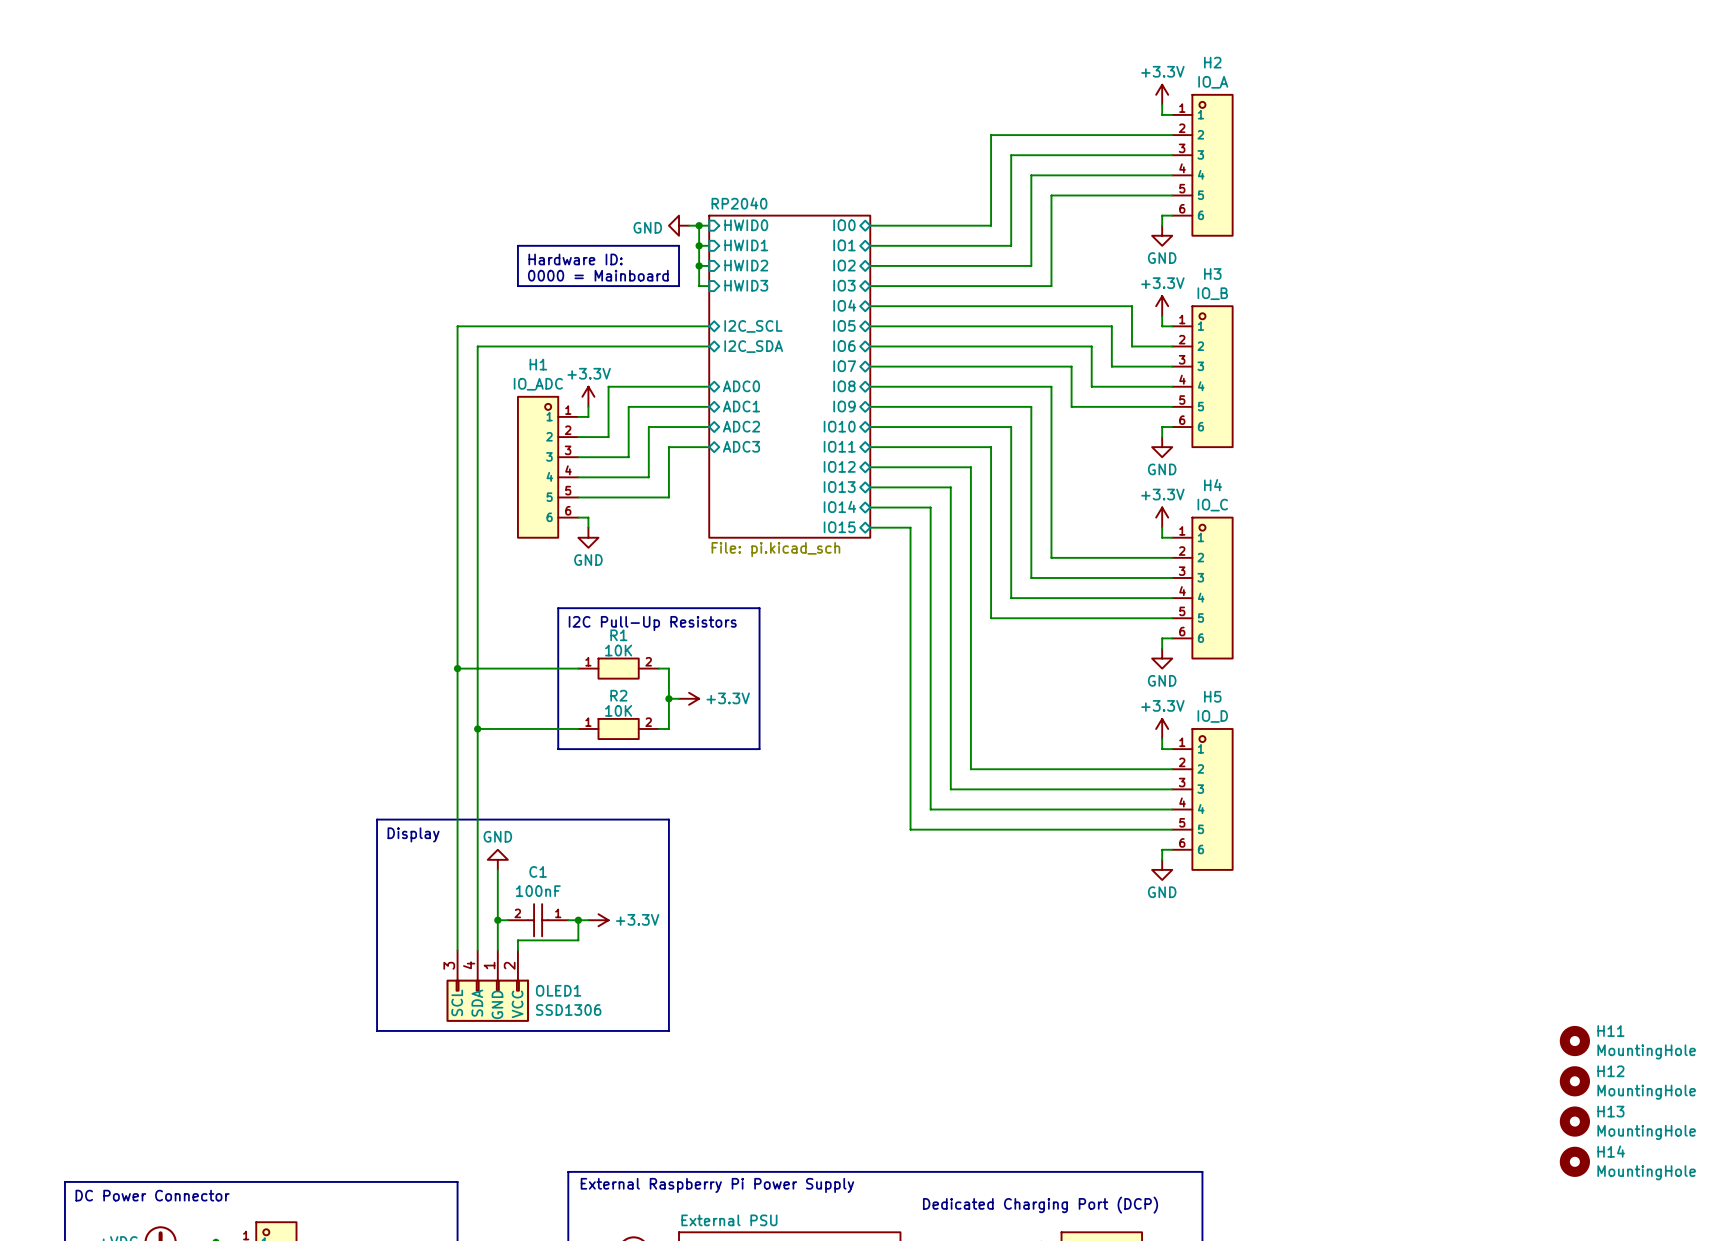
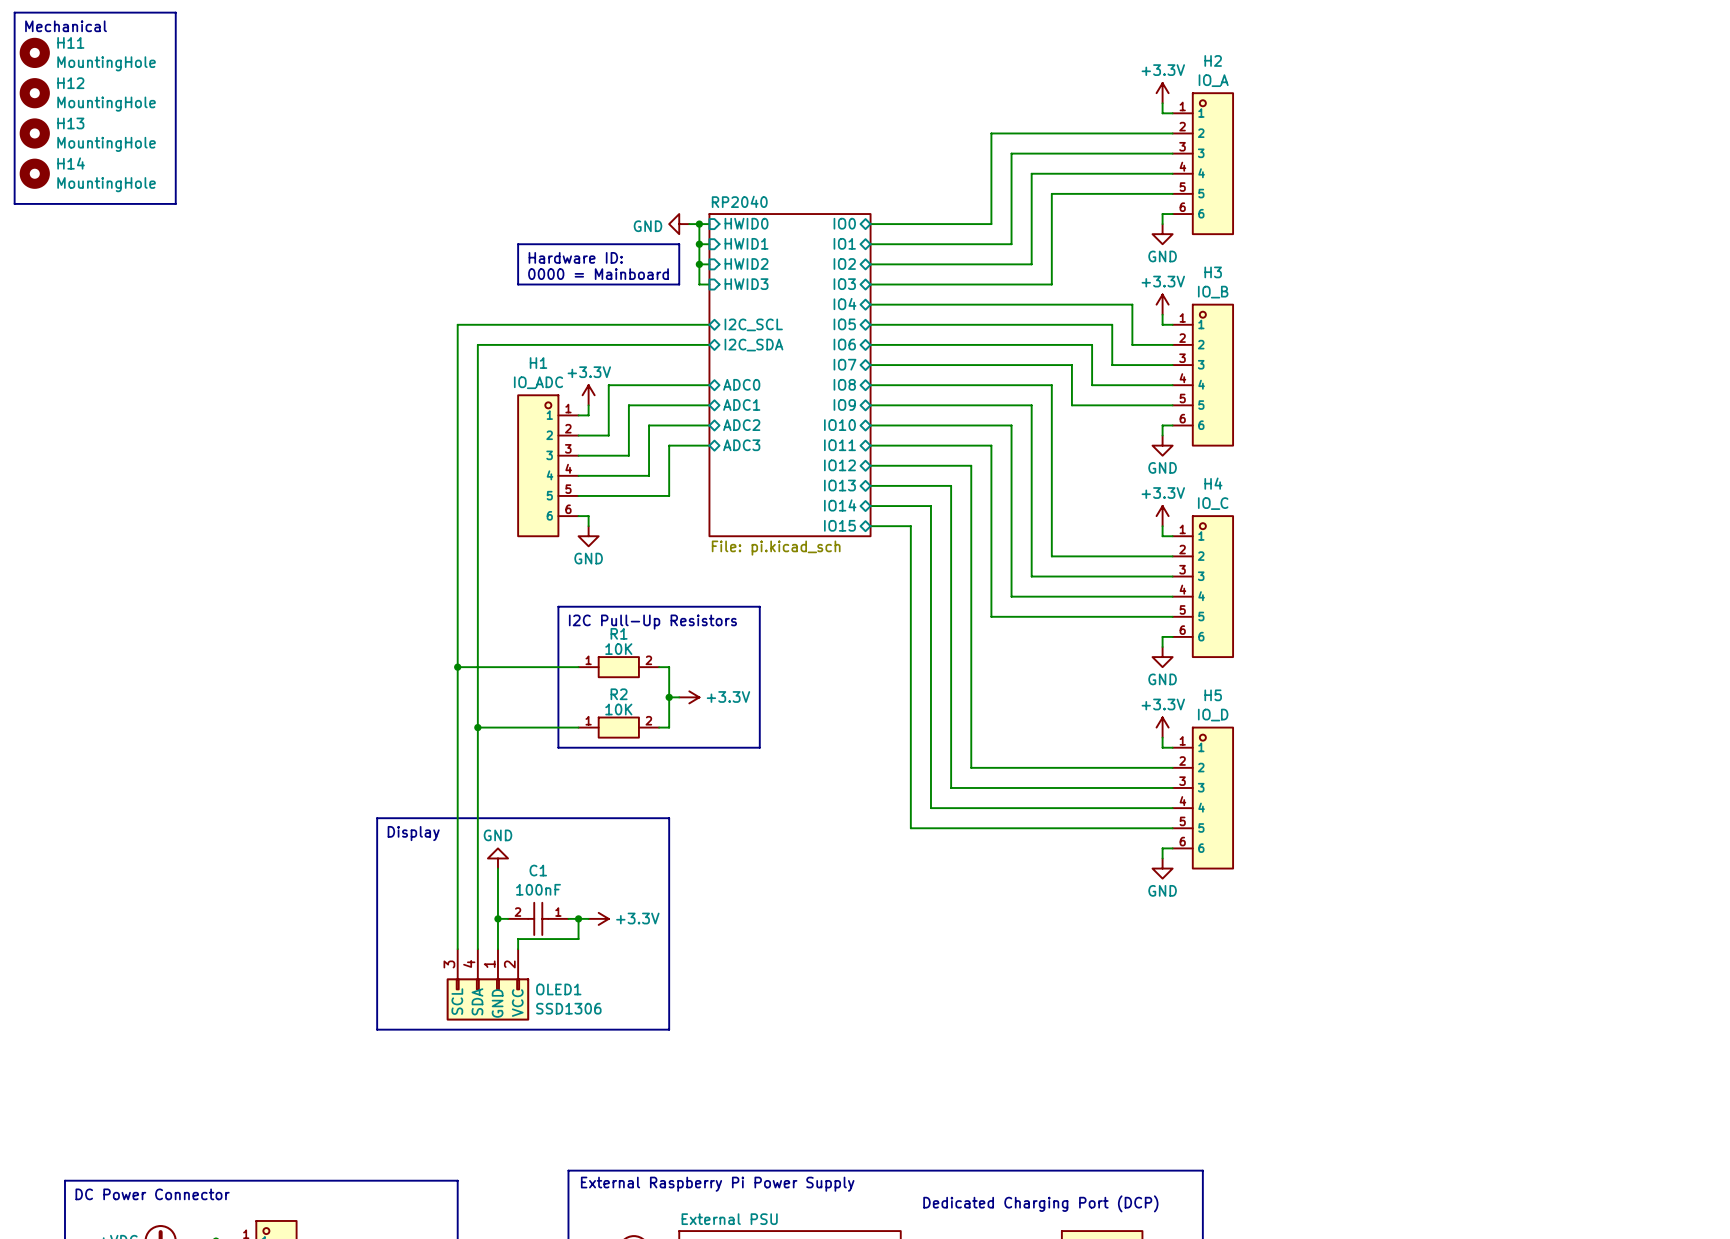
line: none -> (14, 12) (175, 12) (175, 203) (14, 203) (14, 12)
text: none -> Mechanical (66, 26)
H11 position: (1574, 1041) -> (34, 52)
H12 position: (1574, 1081) -> (34, 93)
H13 position: (1574, 1121) -> (34, 133)
H14 position: (1574, 1161) -> (34, 173)

